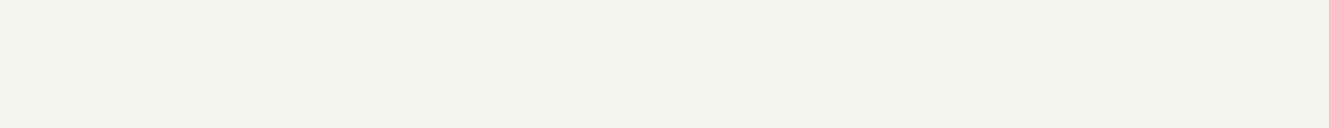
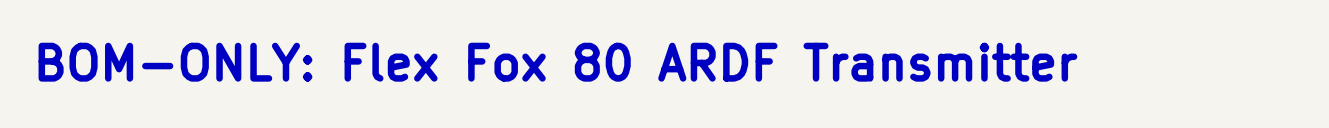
text: none -> BOM-ONLY: Flex Fox 80 ARDF Transmitter (557, 62)

